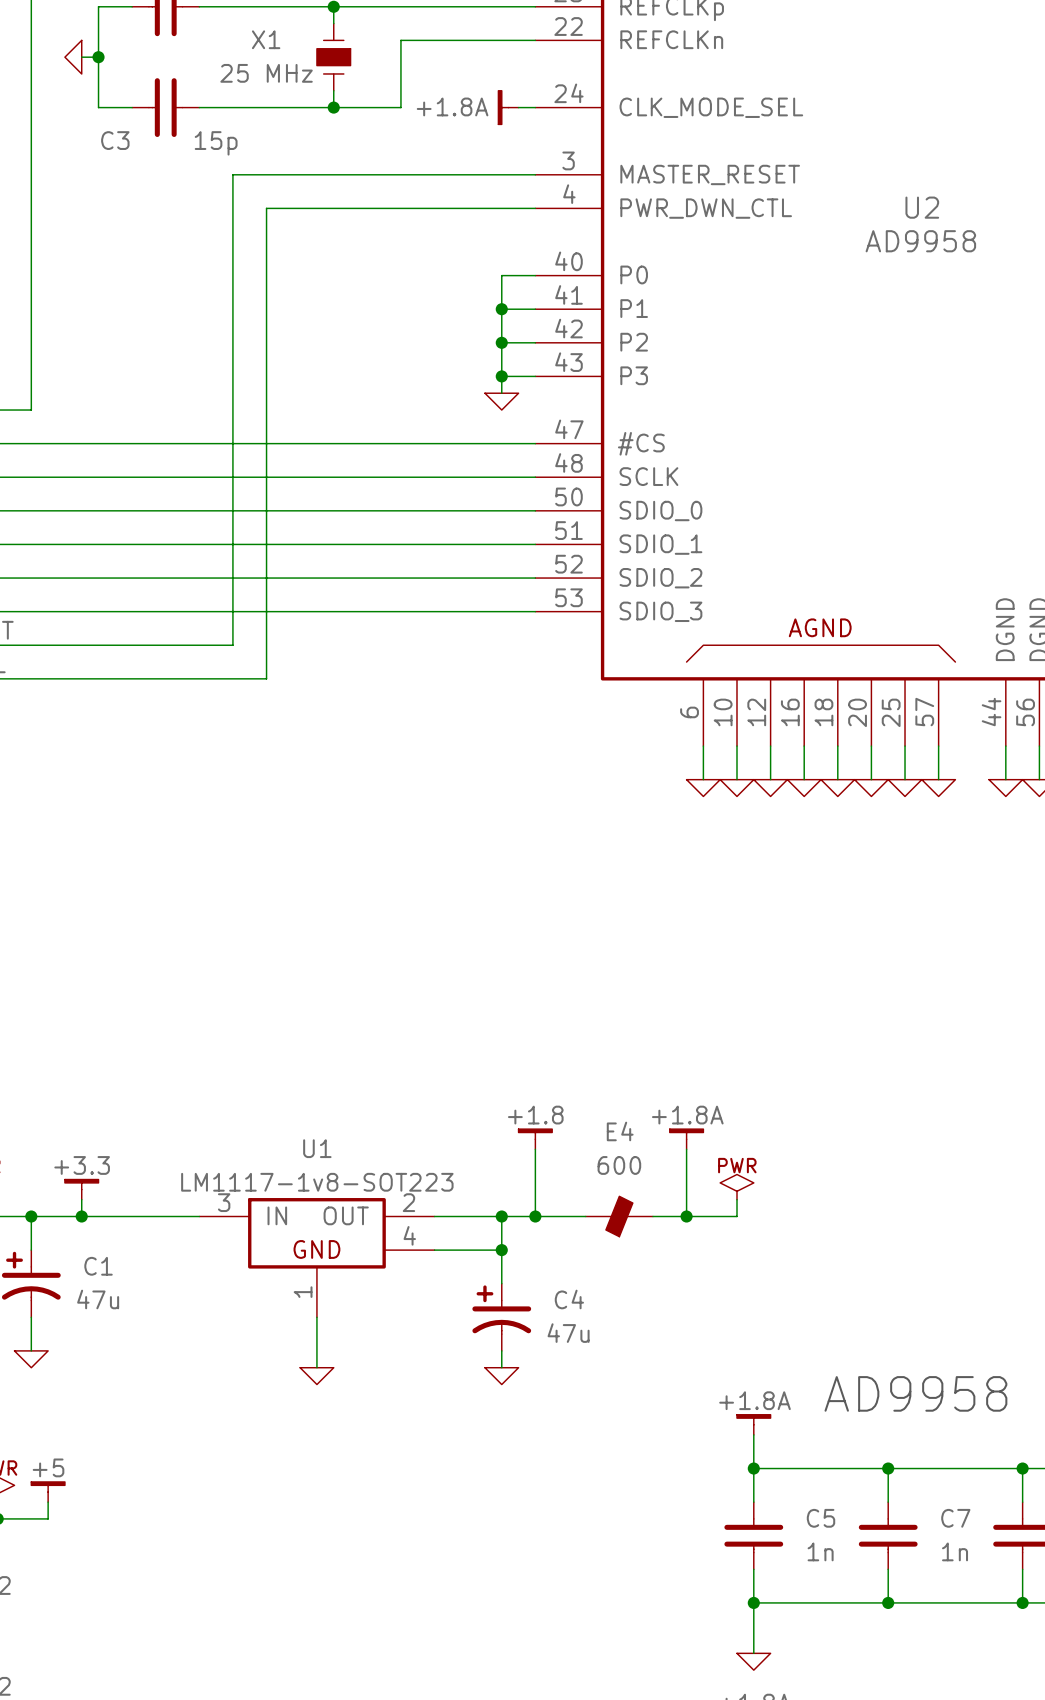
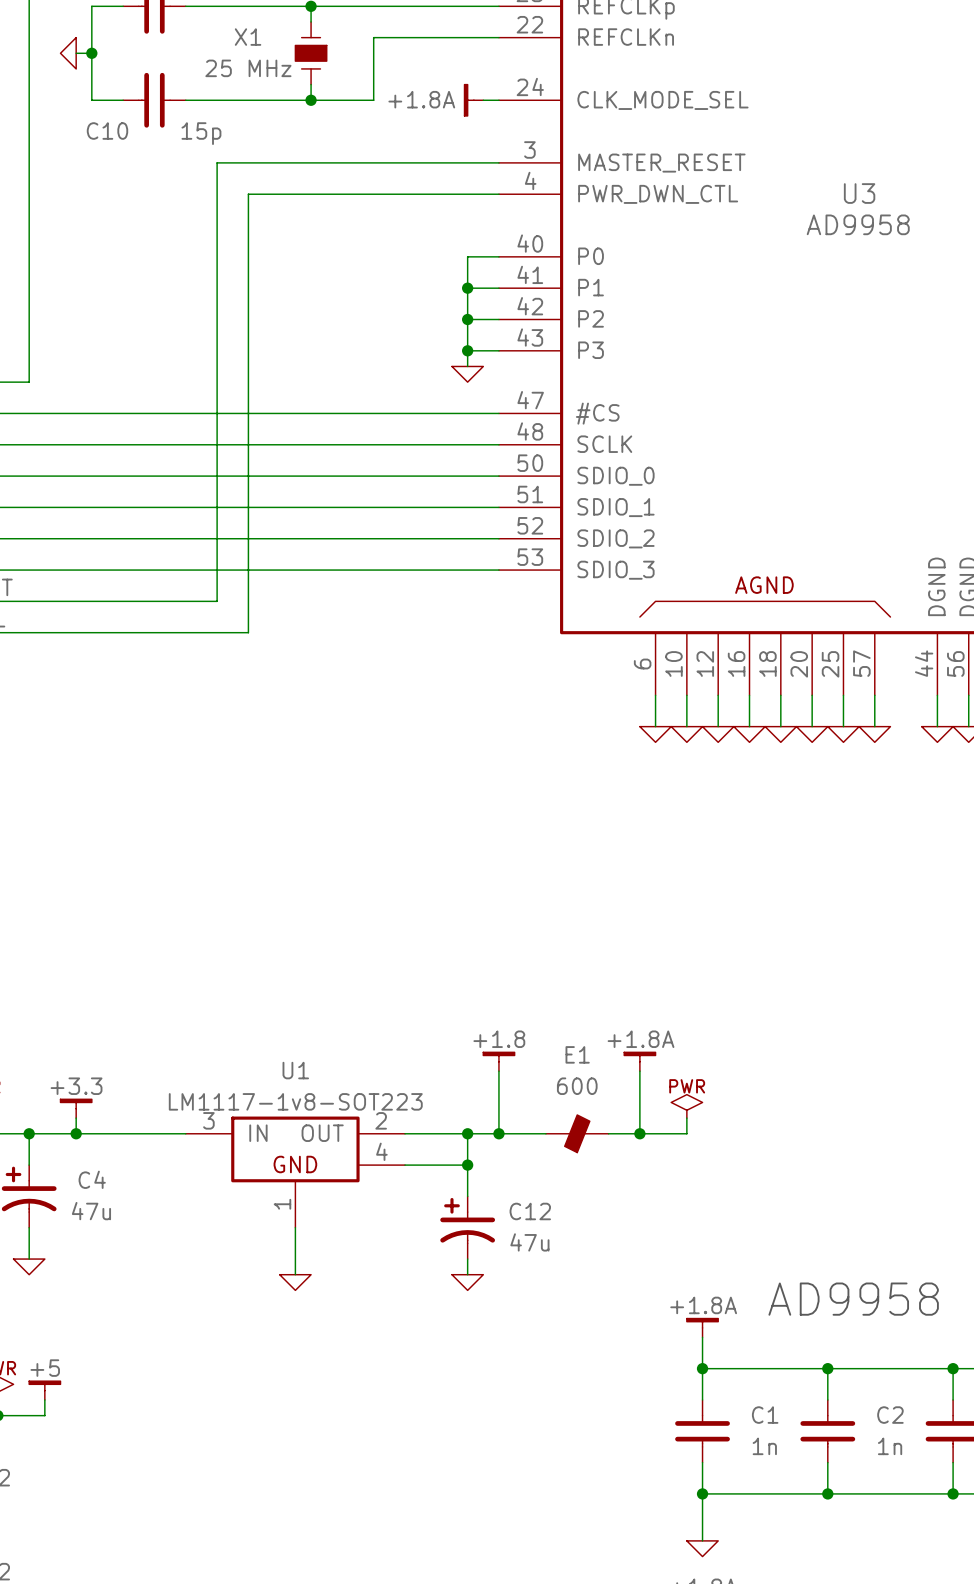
C3 name: C3 (115, 140) -> C10 (107, 131)
U2 name: U2 (922, 207) -> U3 (859, 193)
E4 name: E4 (620, 1131) -> E1 (577, 1054)
C1 name: C1 (98, 1266) -> C4 (92, 1179)
C4 name: C4 (569, 1299) -> C12 (530, 1211)
C5 name: C5 (821, 1518) -> C1 (765, 1415)
C7 name: C7 (955, 1518) -> C2 (890, 1415)

